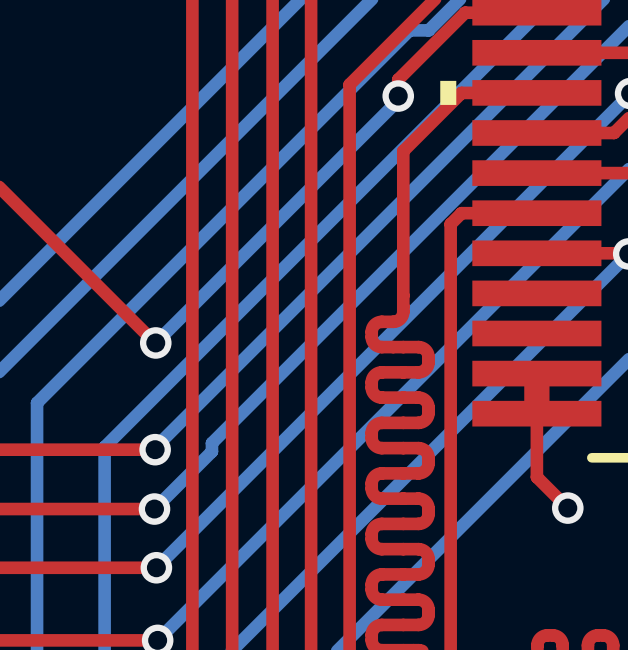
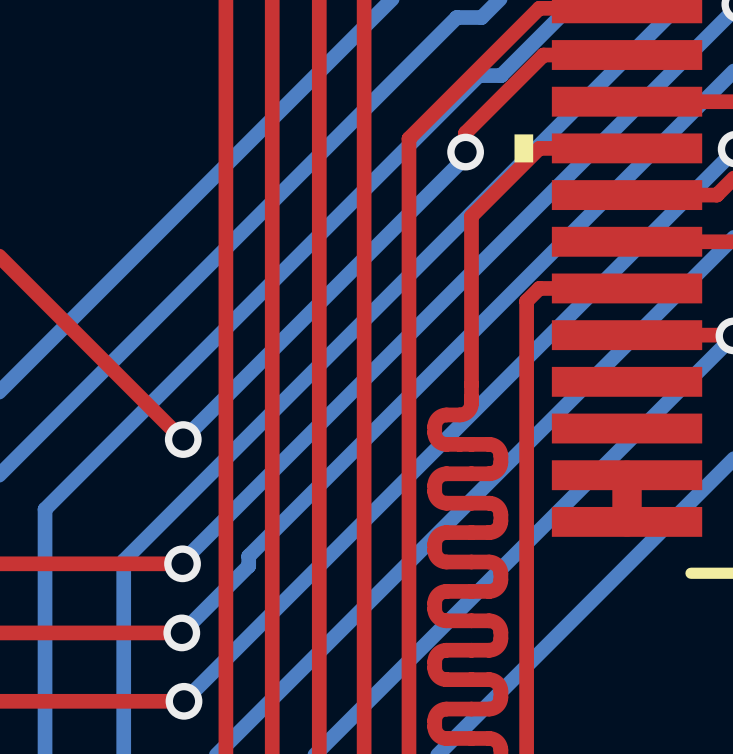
top track: (536, 413) (536, 477) (567, 508) -> none
via: (567, 508) -> none

